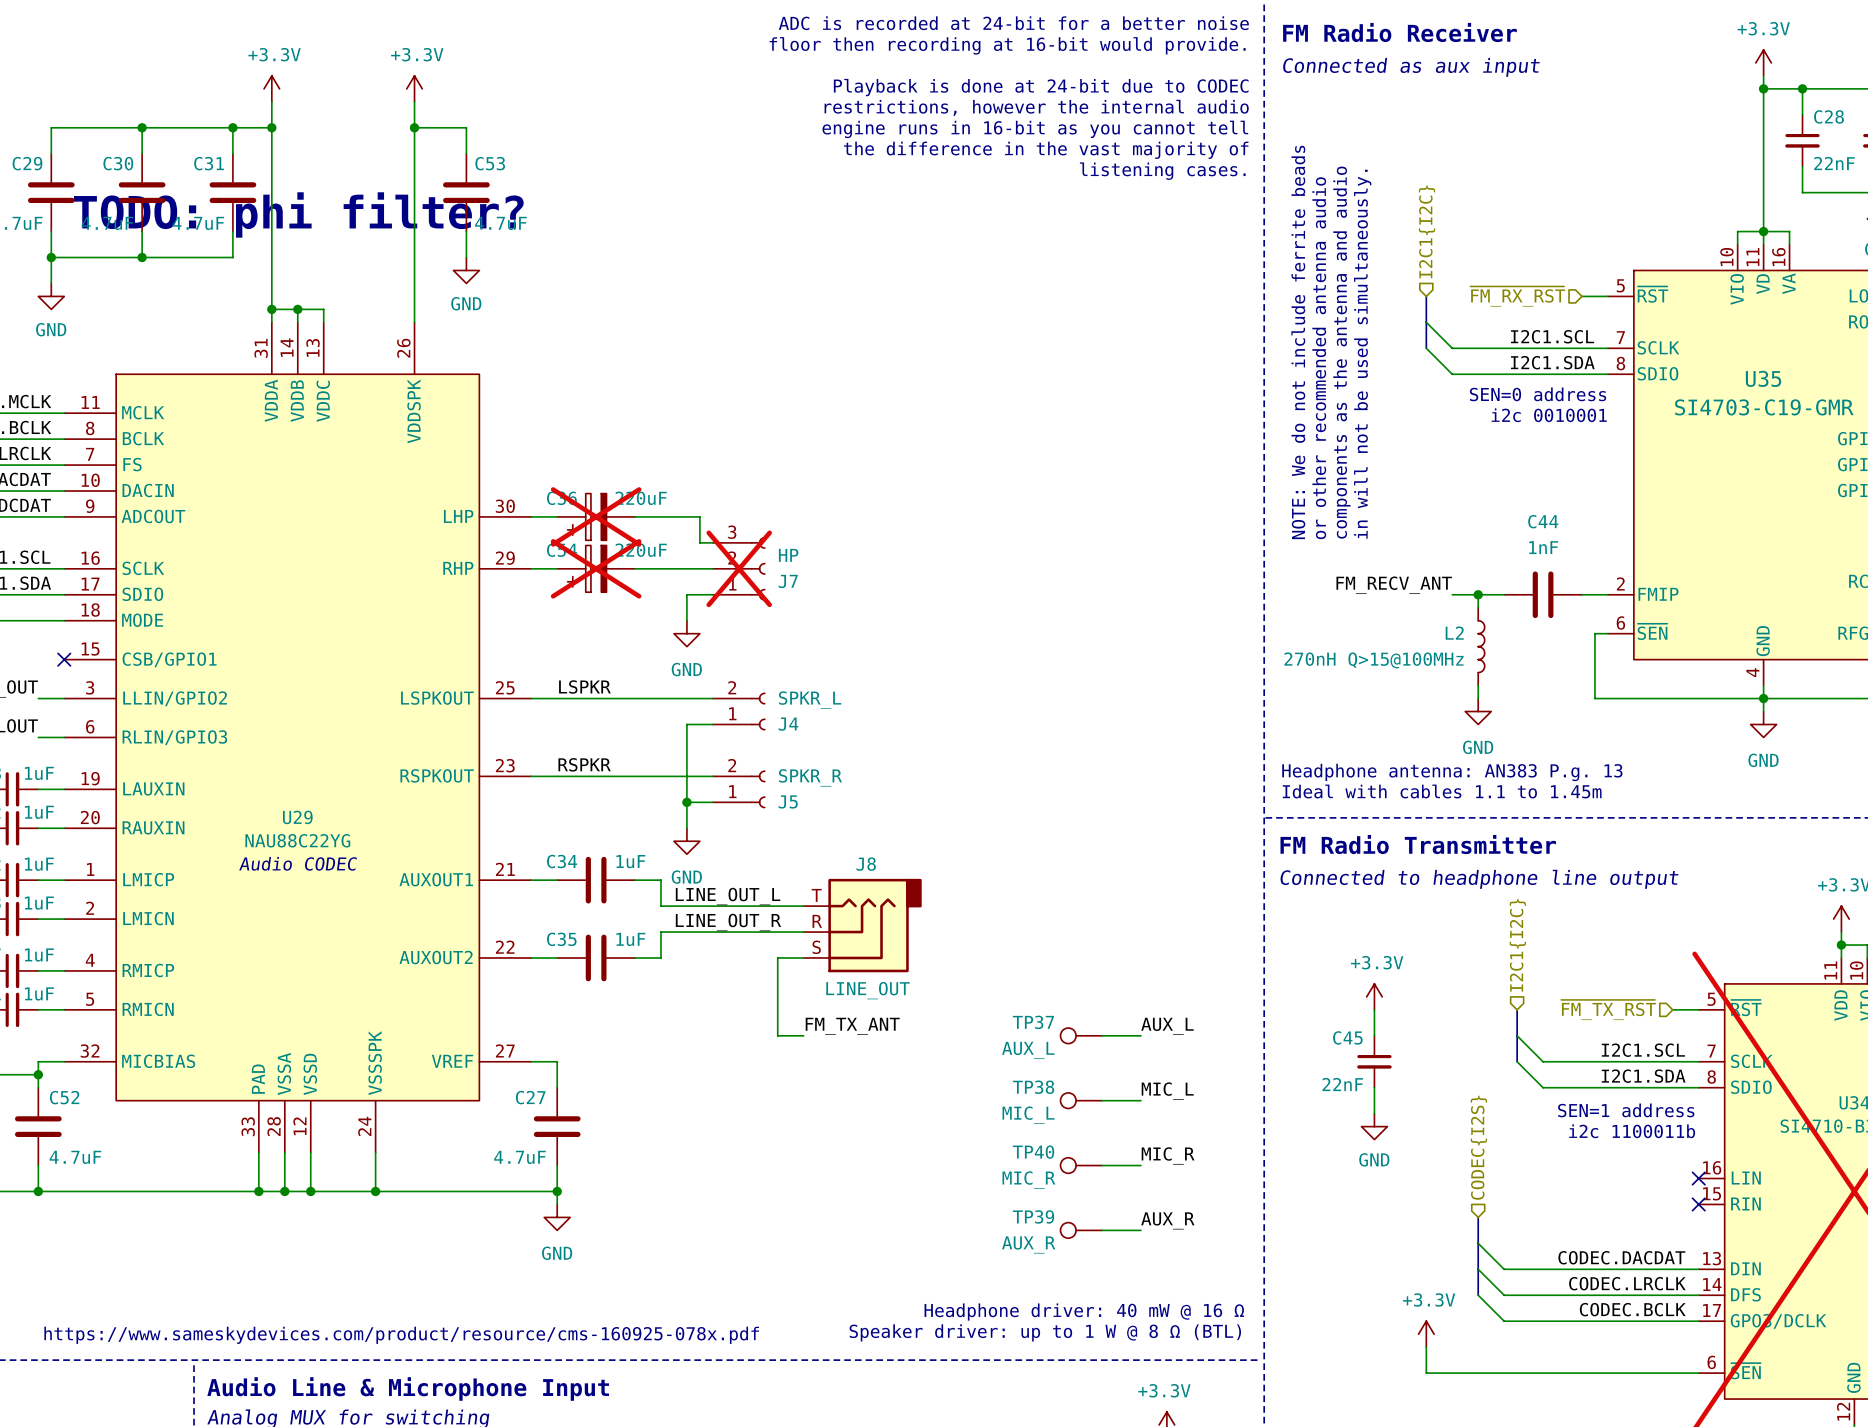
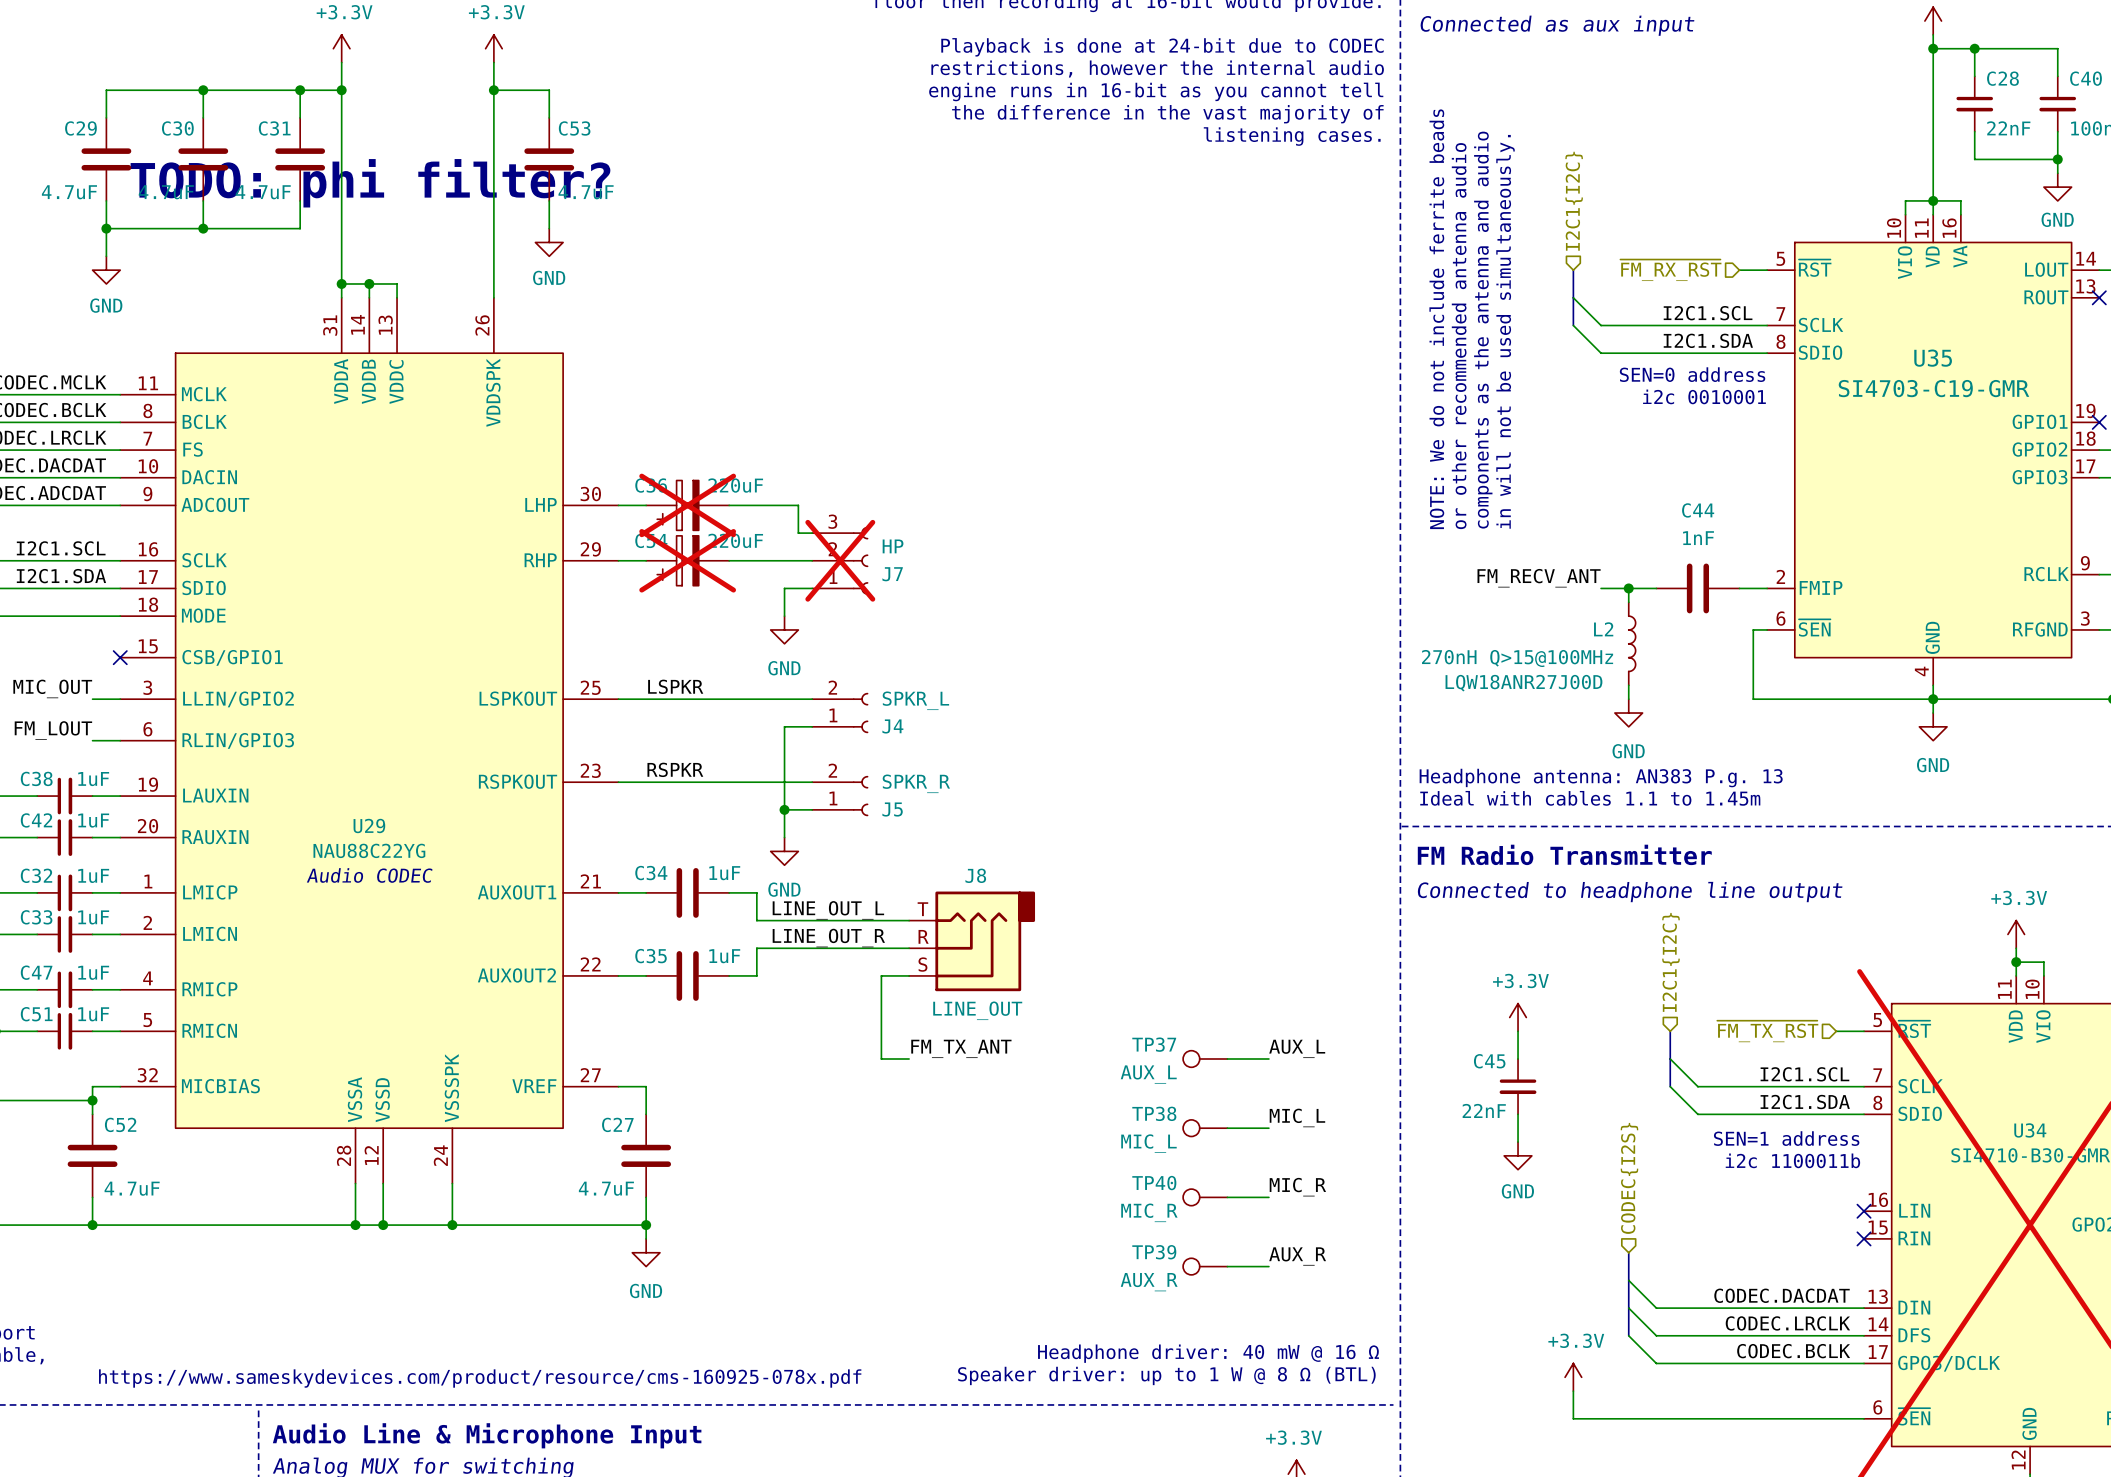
U29 symbol: [64, 322, 532, 1153] -> [120, 297, 619, 1184]
L2 text: none -> LQW18ANR27J00D (1523, 683)
wire: (258, 1152) (258, 1191) -> none
junction: (258, 1191) -> none

